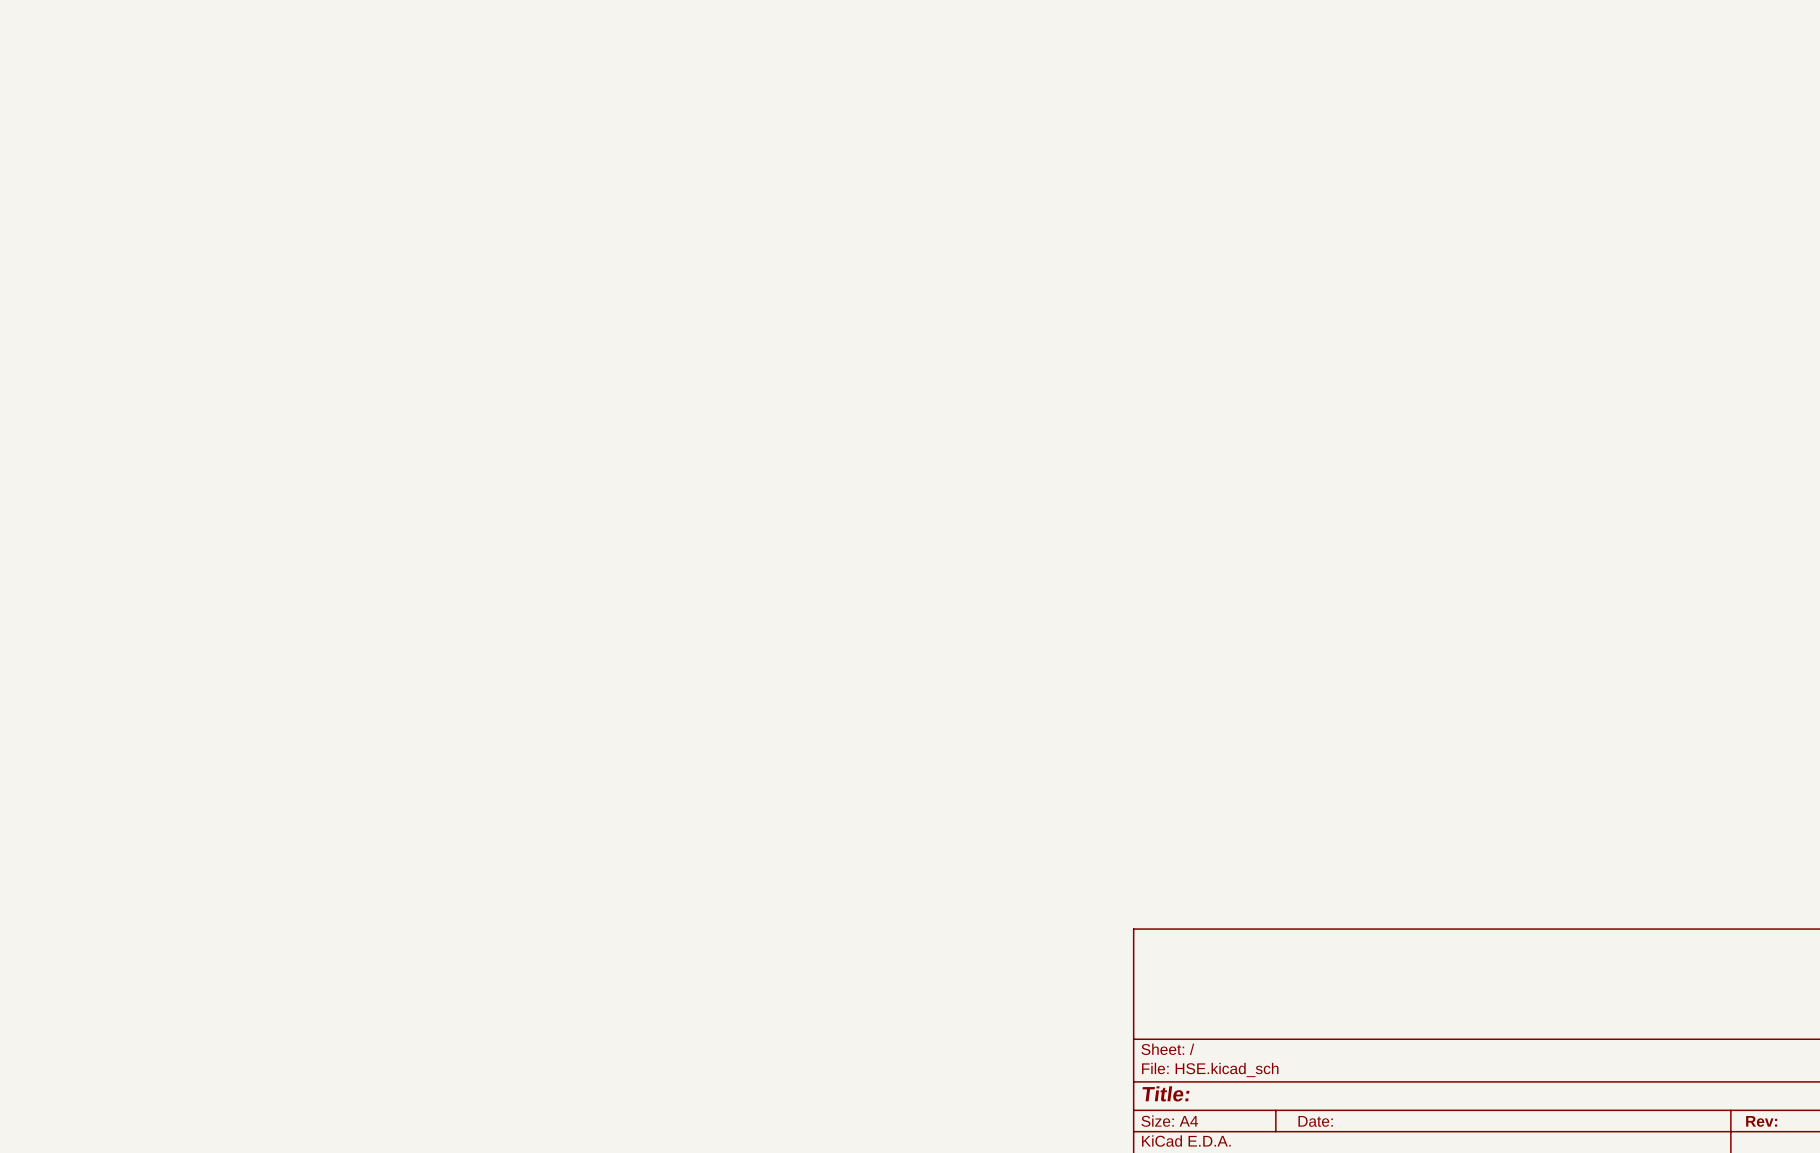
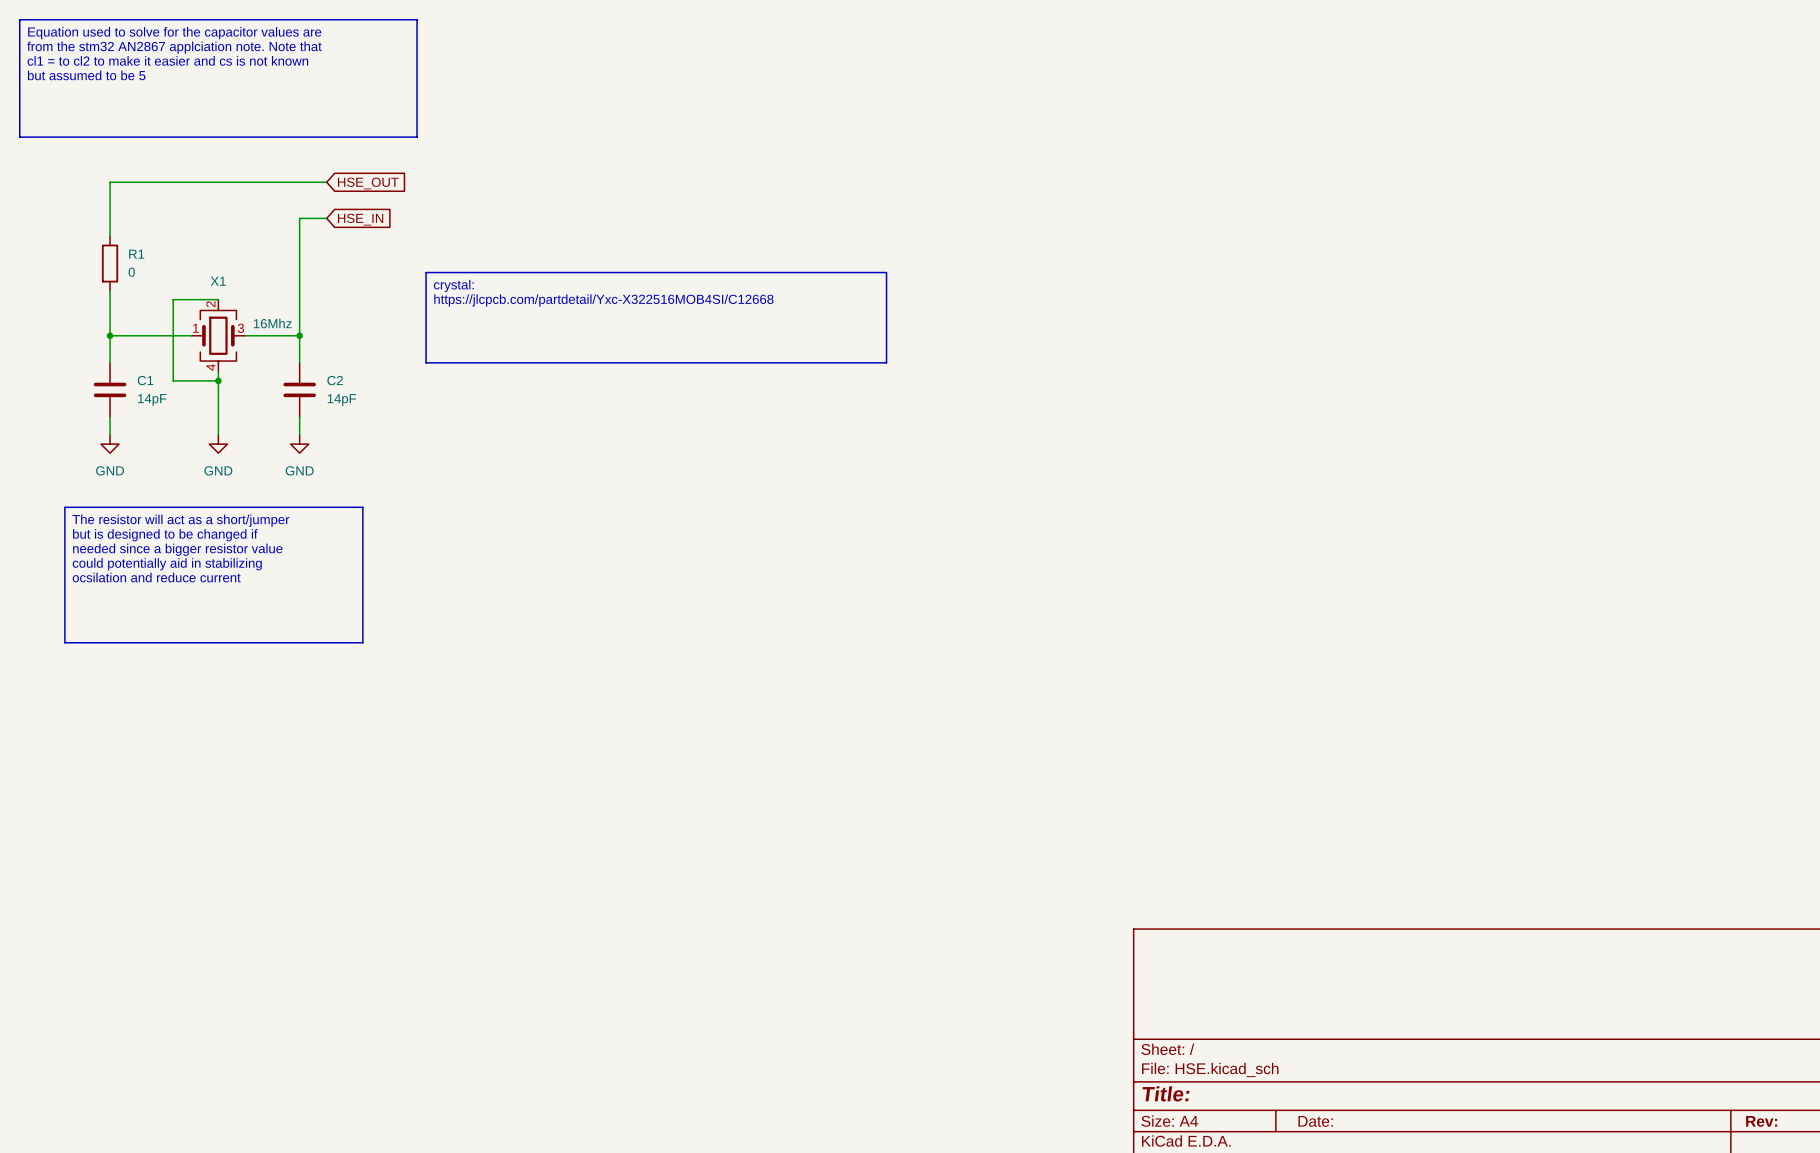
line: none -> (19, 19) (417, 19) (417, 137) (19, 137) (19, 19)
text: none -> Equation used to solve for the capacitor values are (174, 33)
text: none -> from the stm32 AN2867 applciation note. Note that (174, 47)
text: none -> cl1 = to cl2 to make it easier and cs is not known (167, 60)
text: none -> but assumed to be 5 (86, 75)
wire: none -> (326, 182) (110, 182) (110, 236)
global label: none -> HSE_OUT (368, 183)
wire: none -> (326, 218) (299, 218) (299, 362)
global label: none -> HSE_IN (360, 219)
R1: none -> 0 (110, 263)
line: none -> (426, 272) (886, 272) (886, 362) (426, 362) (426, 272)
text: none -> crystal: (453, 285)
wire: none -> (110, 290) (110, 362)
wire: none -> (218, 299) (173, 299) (173, 380) (218, 380)
text: none -> https://jlcpcb.com/partdetail/Yxc-X322516MOB4SI/C12668 (603, 300)
wire: none -> (110, 335) (191, 335)
junction: none -> (110, 335)
X1: none -> 16Mhz (218, 335)
wire: none -> (245, 335) (299, 335)
junction: none -> (299, 335)
wire: none -> (218, 371) (218, 435)
junction: none -> (218, 380)
C1: none -> 14pF (110, 389)
C2: none -> 14pF (299, 389)
wire: none -> (110, 417) (110, 435)
wire: none -> (299, 417) (299, 435)
power symbol: none -> GND (110, 444)
power symbol: none -> GND (218, 444)
power symbol: none -> GND (299, 444)
line: none -> (64, 507) (362, 507) (362, 642) (64, 642) (64, 507)
text: none -> The resistor will act as a short/jumper (180, 520)
text: none -> but is designed to be changed if (165, 535)
text: none -> needed since a bigger resistor value (177, 549)
text: none -> could potentially aid in stabilizing (167, 564)
text: none -> ocsilation and reduce current (156, 577)

